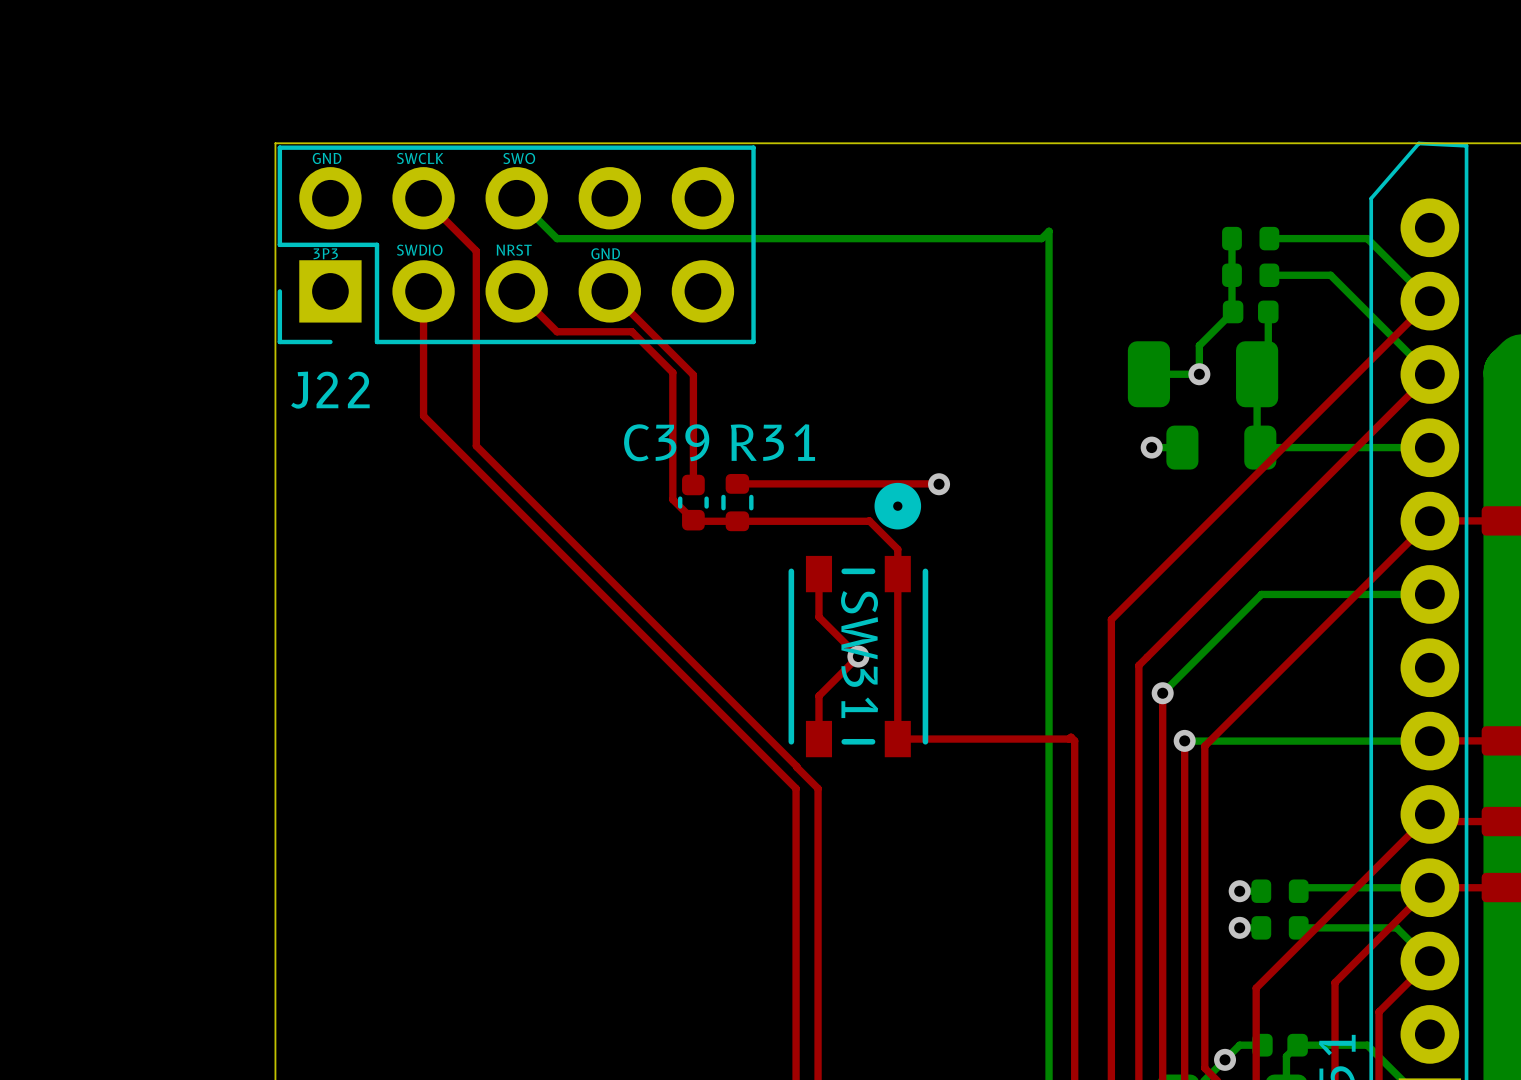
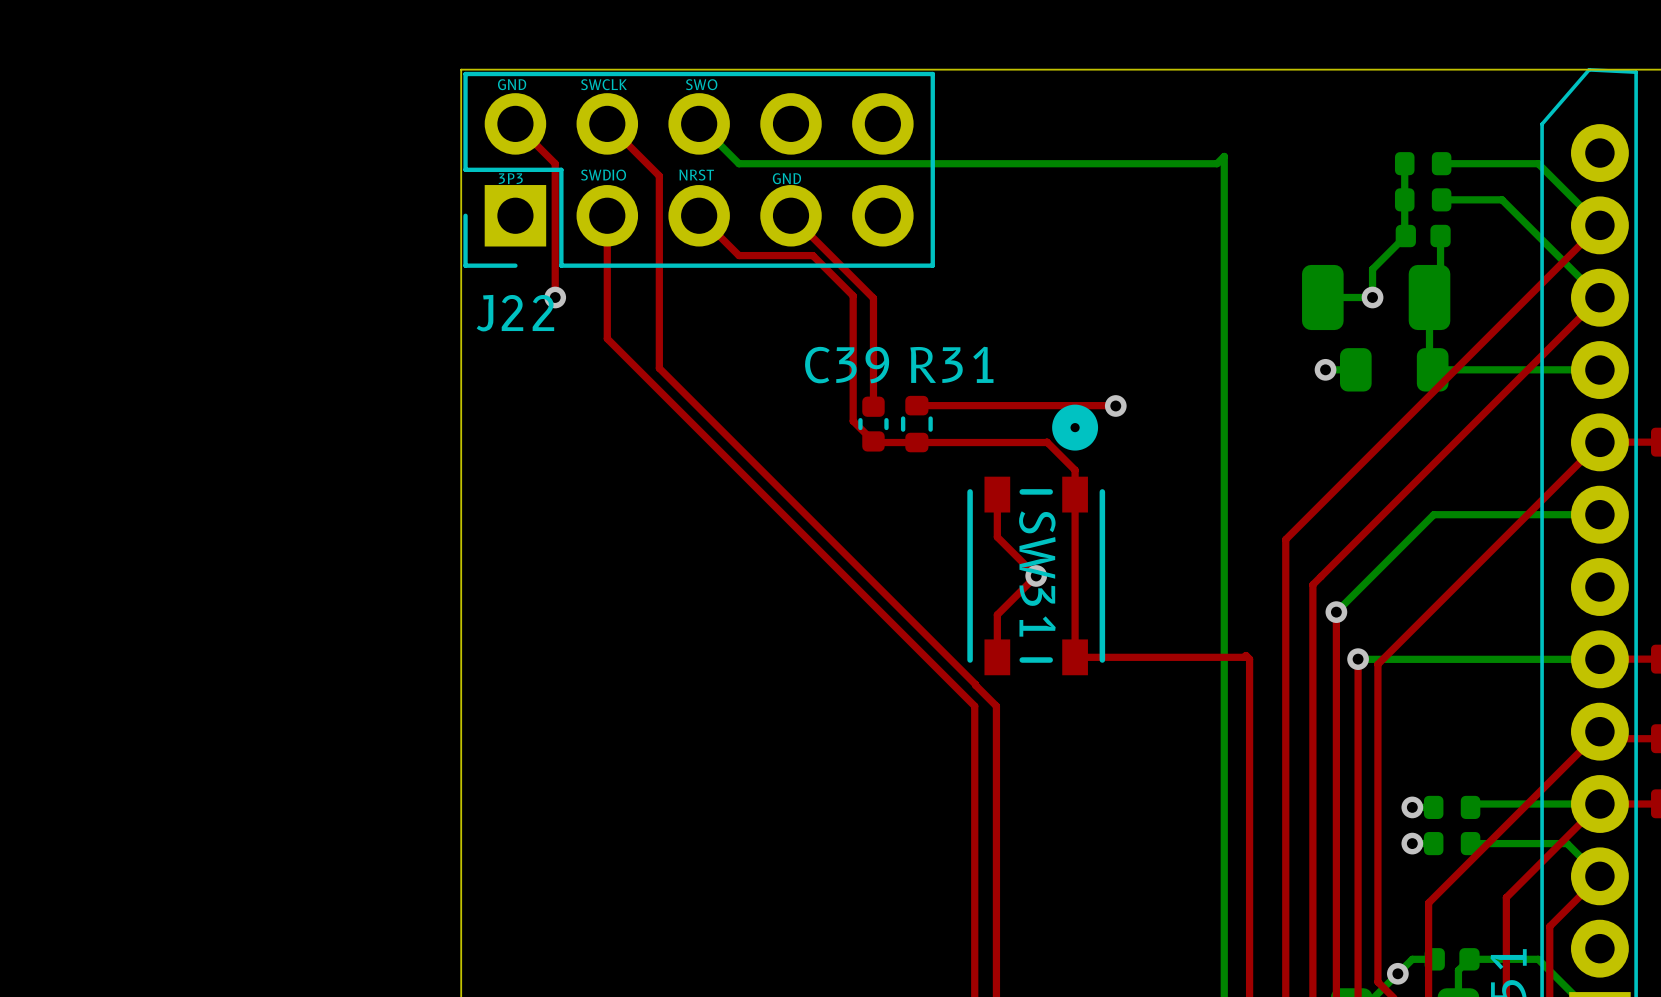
top track: none -> (515, 123) (555, 163) (555, 297)
via: none -> (555, 297)

